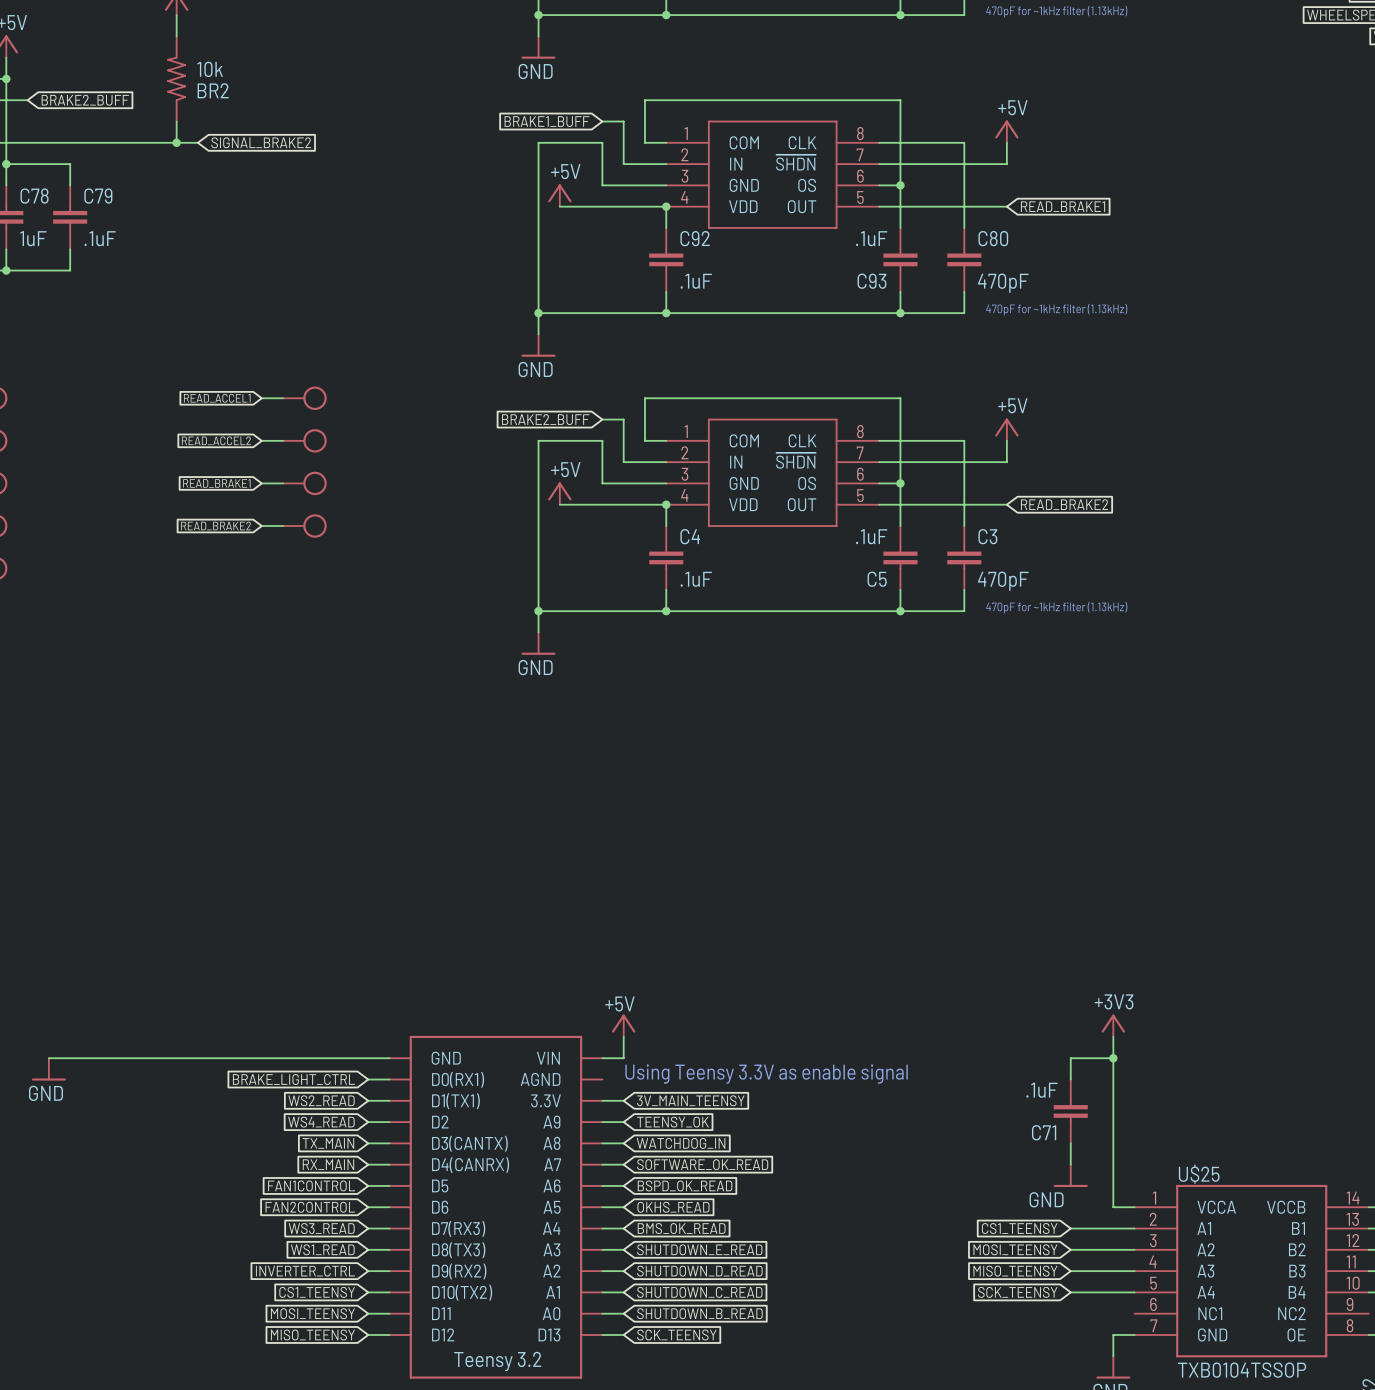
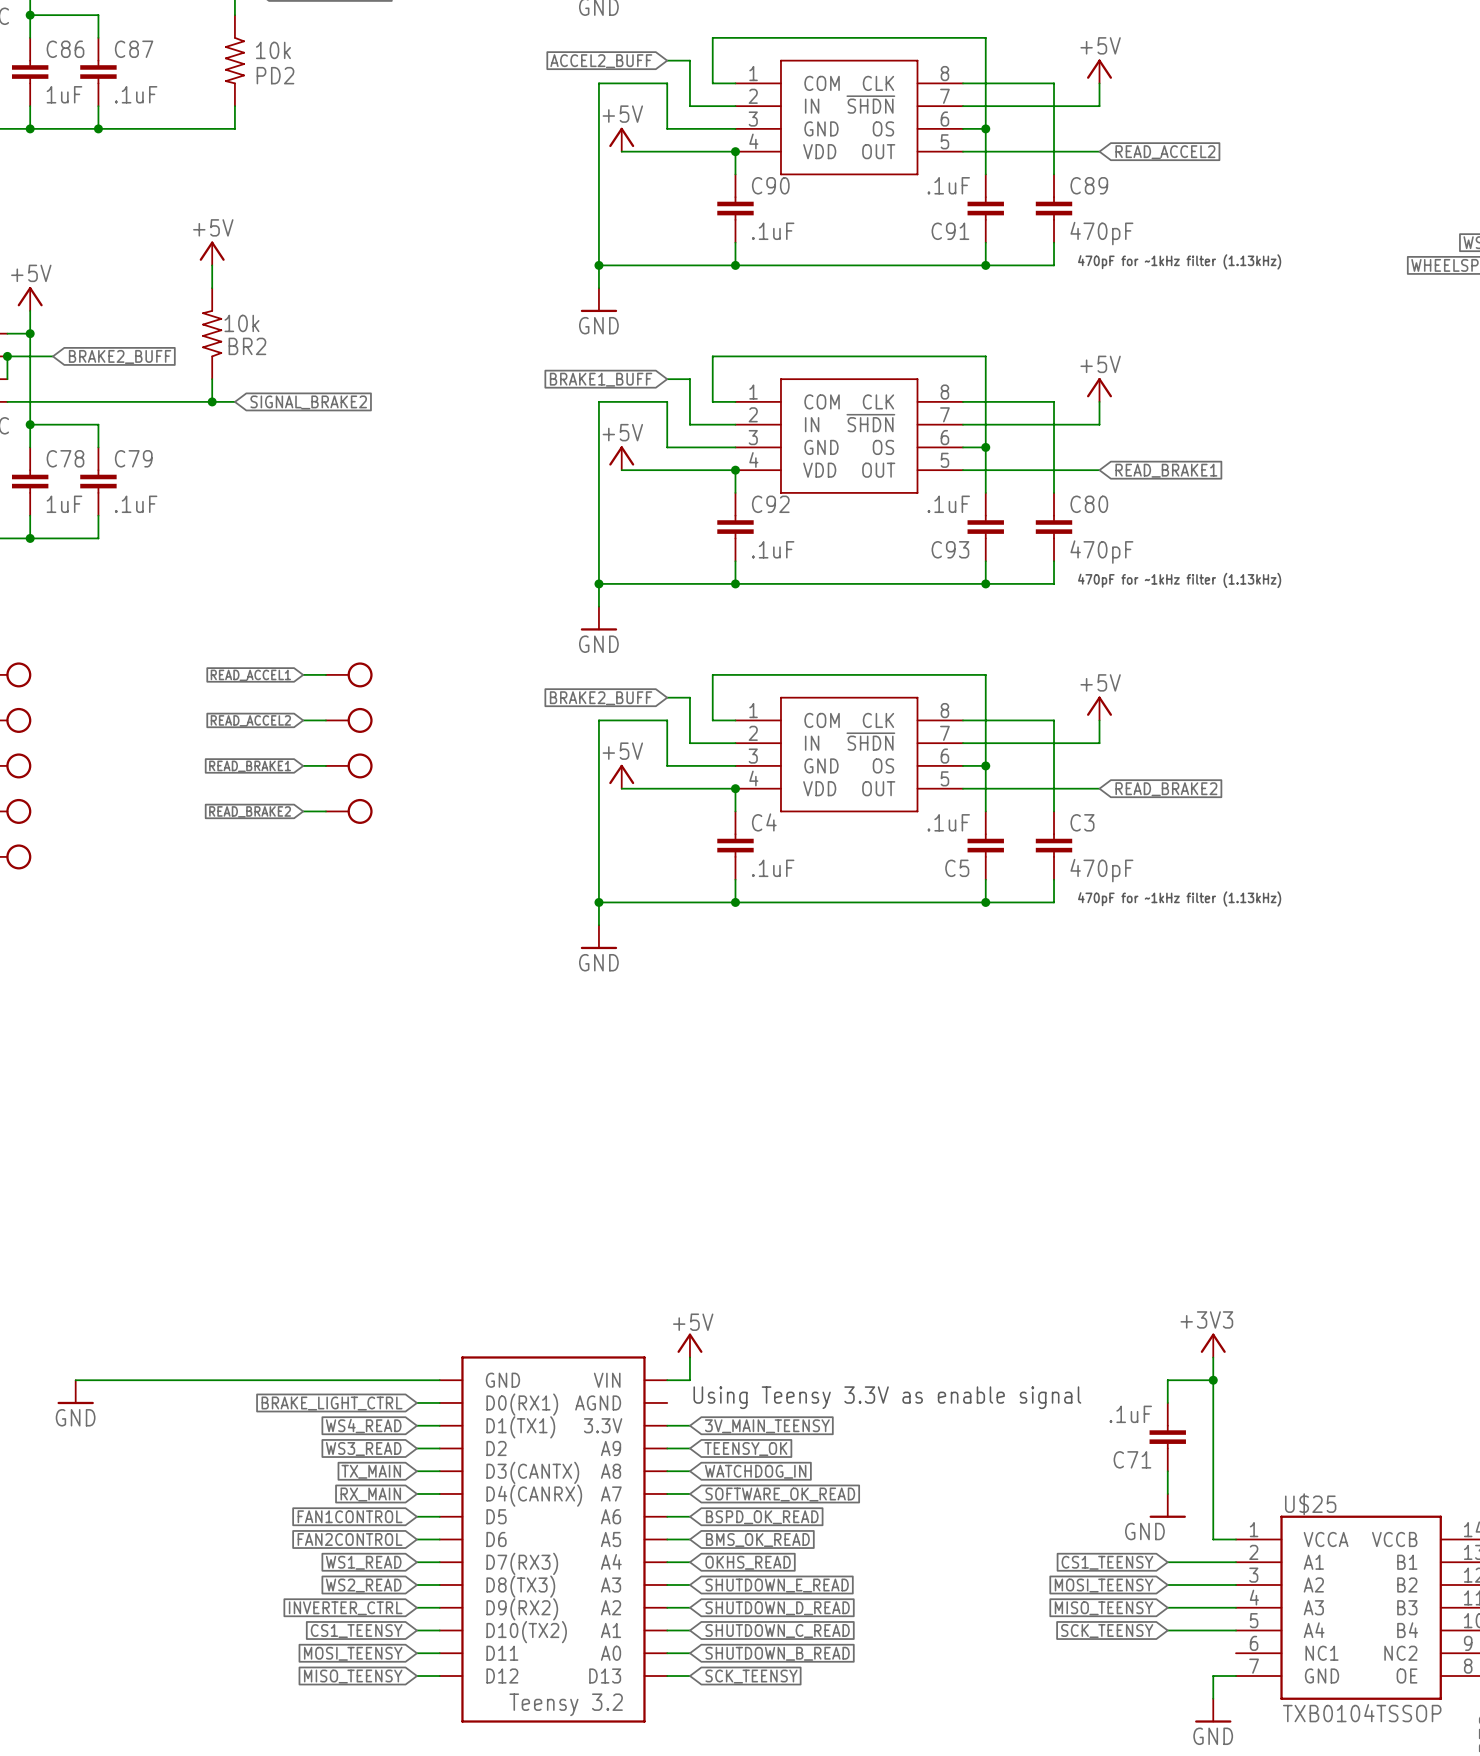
global label: WS2_READ (321, 1100) -> WS4_READ (363, 1426)
global label: WS4_READ (321, 1122) -> WS3_READ (363, 1449)
global label: OKHS_READ (673, 1207) -> BMS_OK_READ (757, 1540)
global label: WS3_READ (321, 1228) -> WS1_READ (363, 1562)
global label: BMS_OK_READ (681, 1228) -> OKHS_READ (748, 1562)
global label: WS1_READ (322, 1249) -> WS2_READ (363, 1585)

